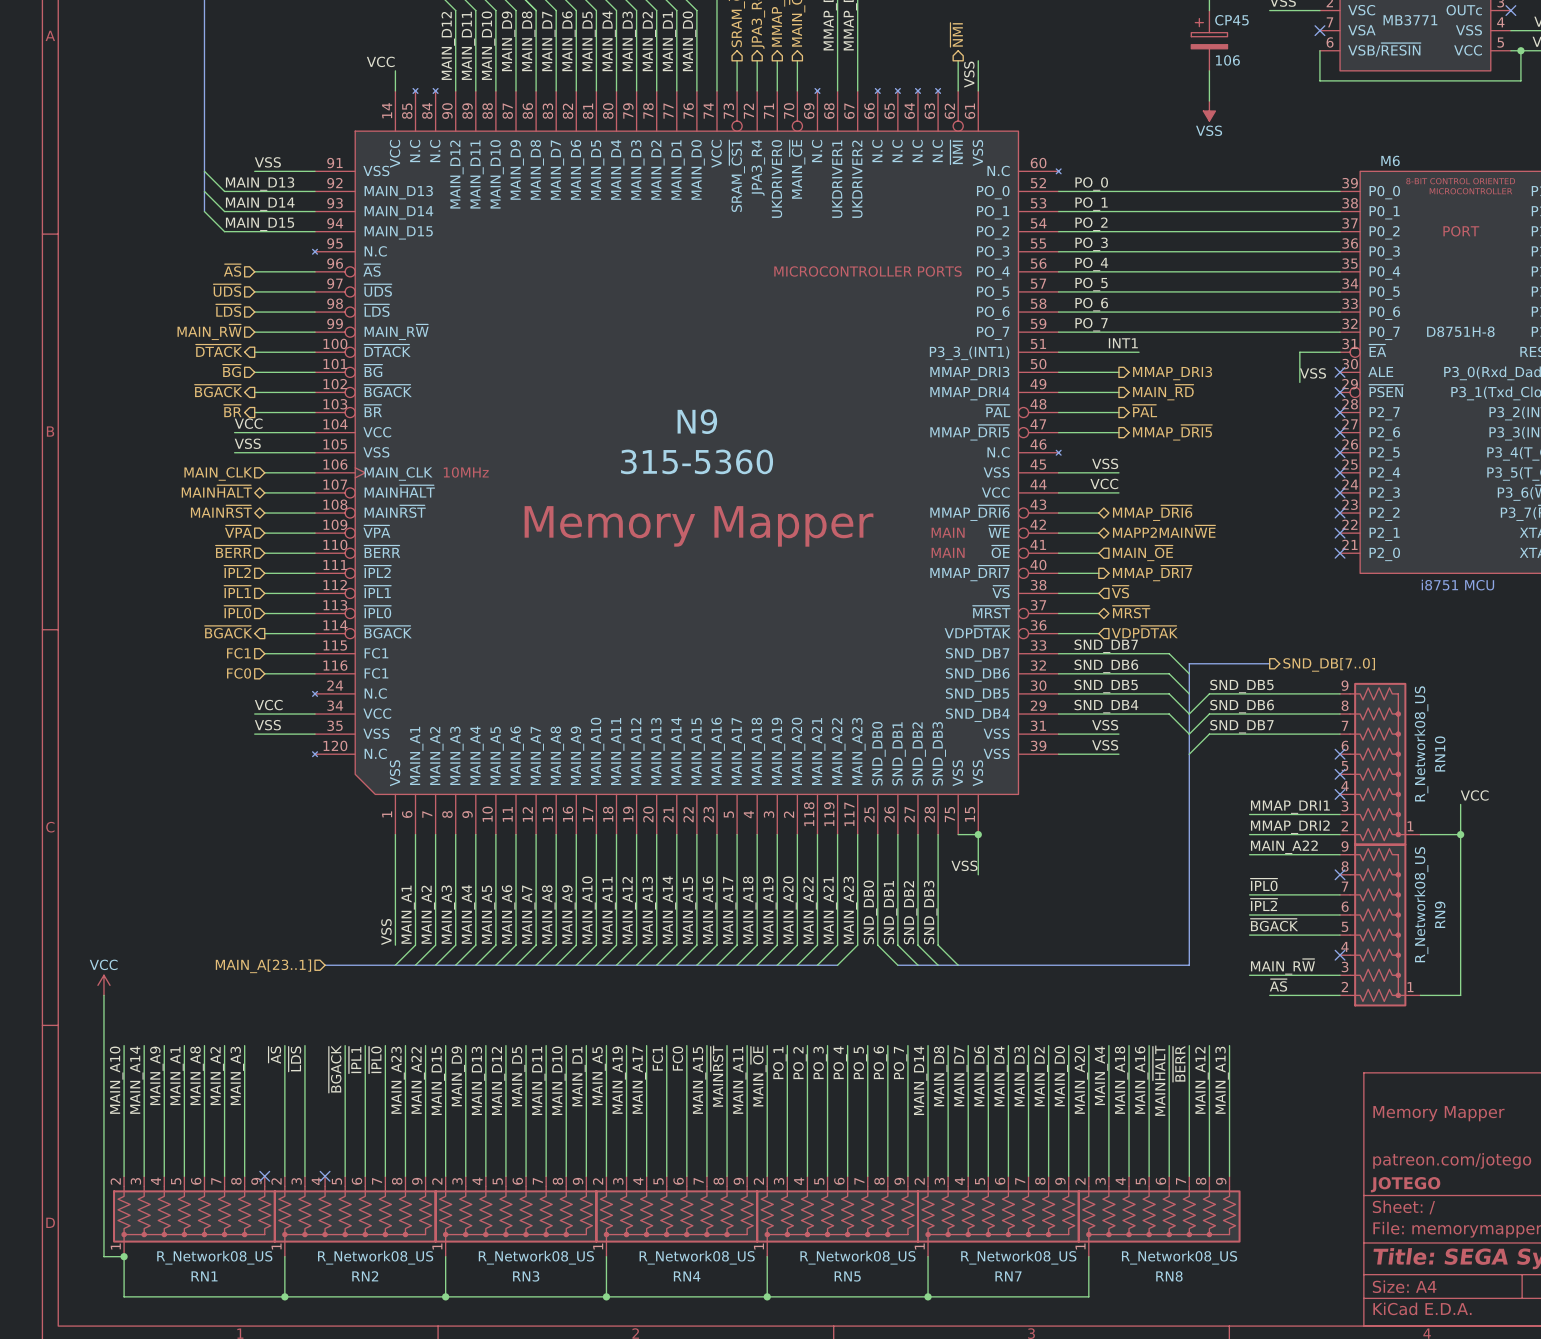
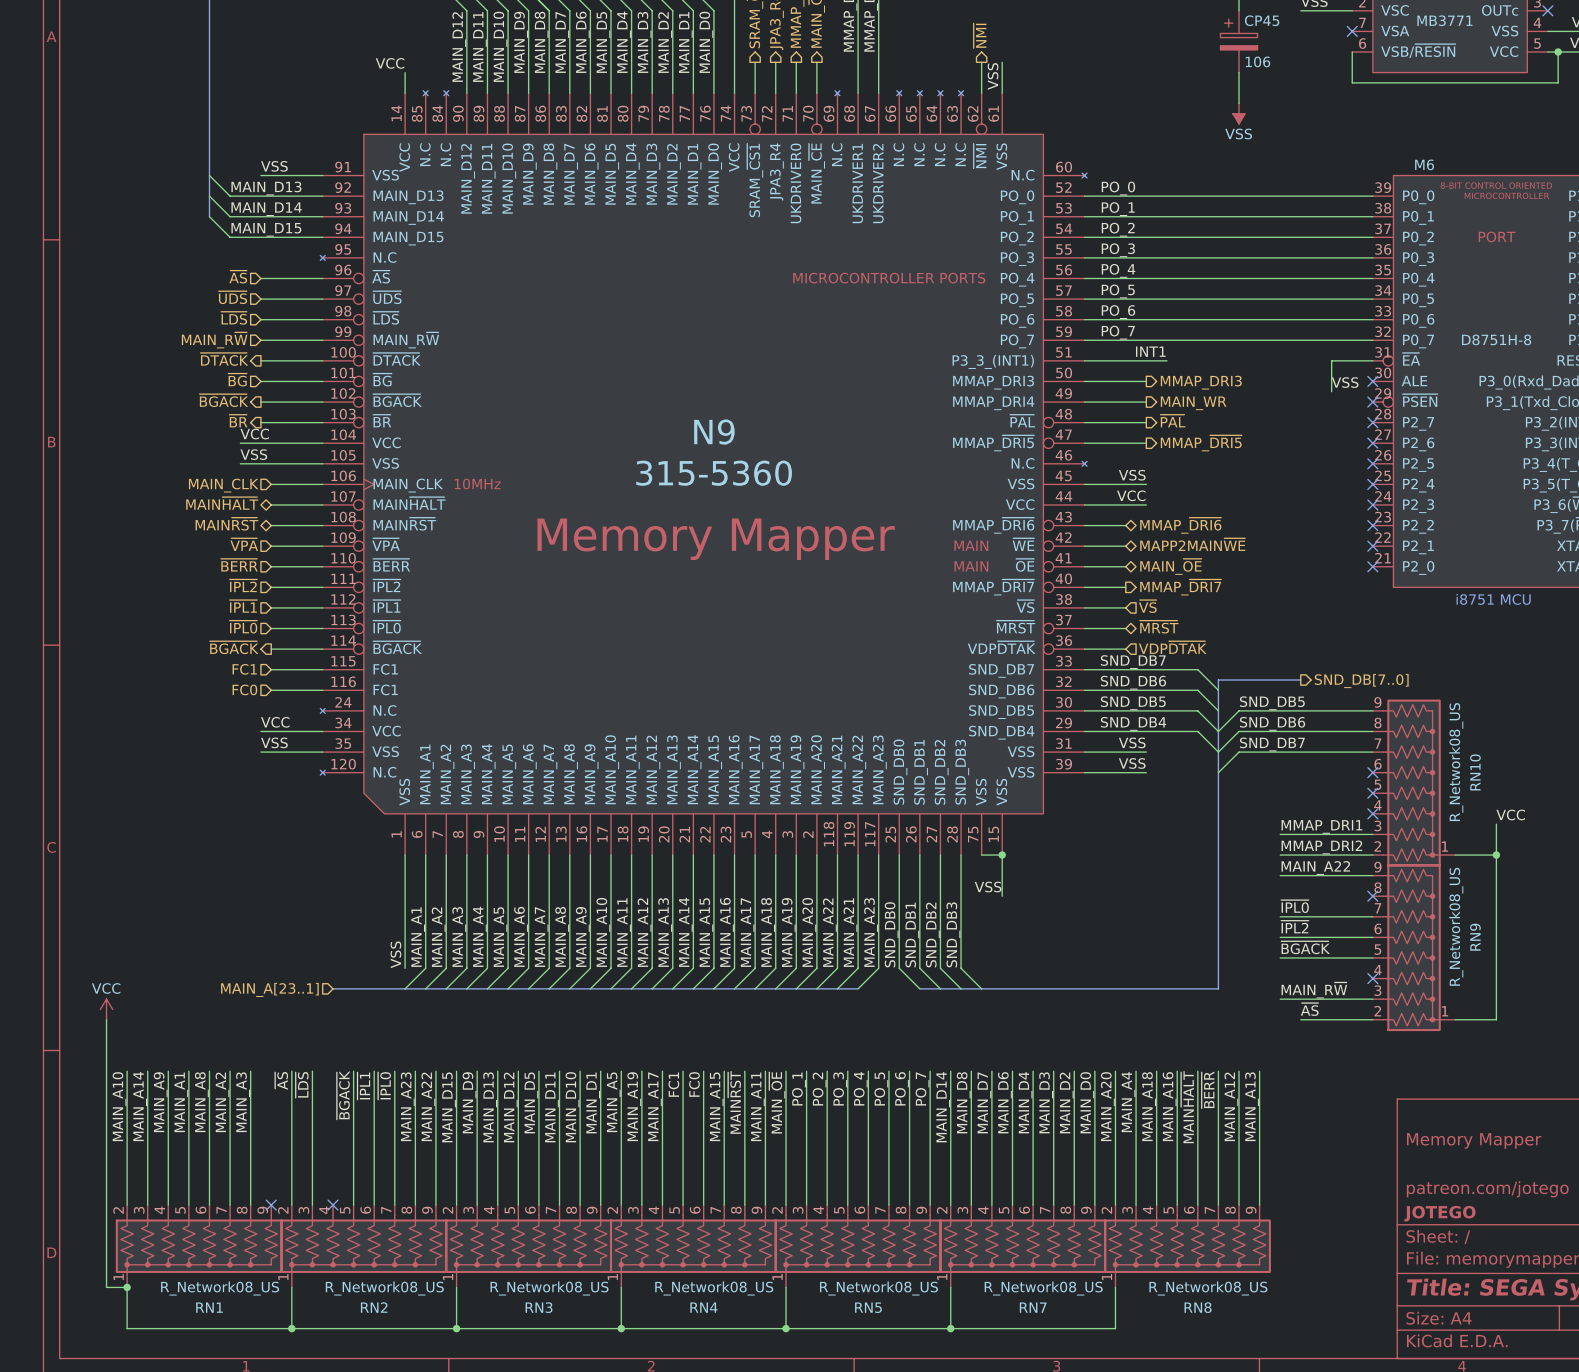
hierarchical label: MAIN_~{RD} (1163, 392) -> MAIN_WR (1193, 403)
hierarchical label shape: input (1142, 553) -> bidirectional (1170, 566)

